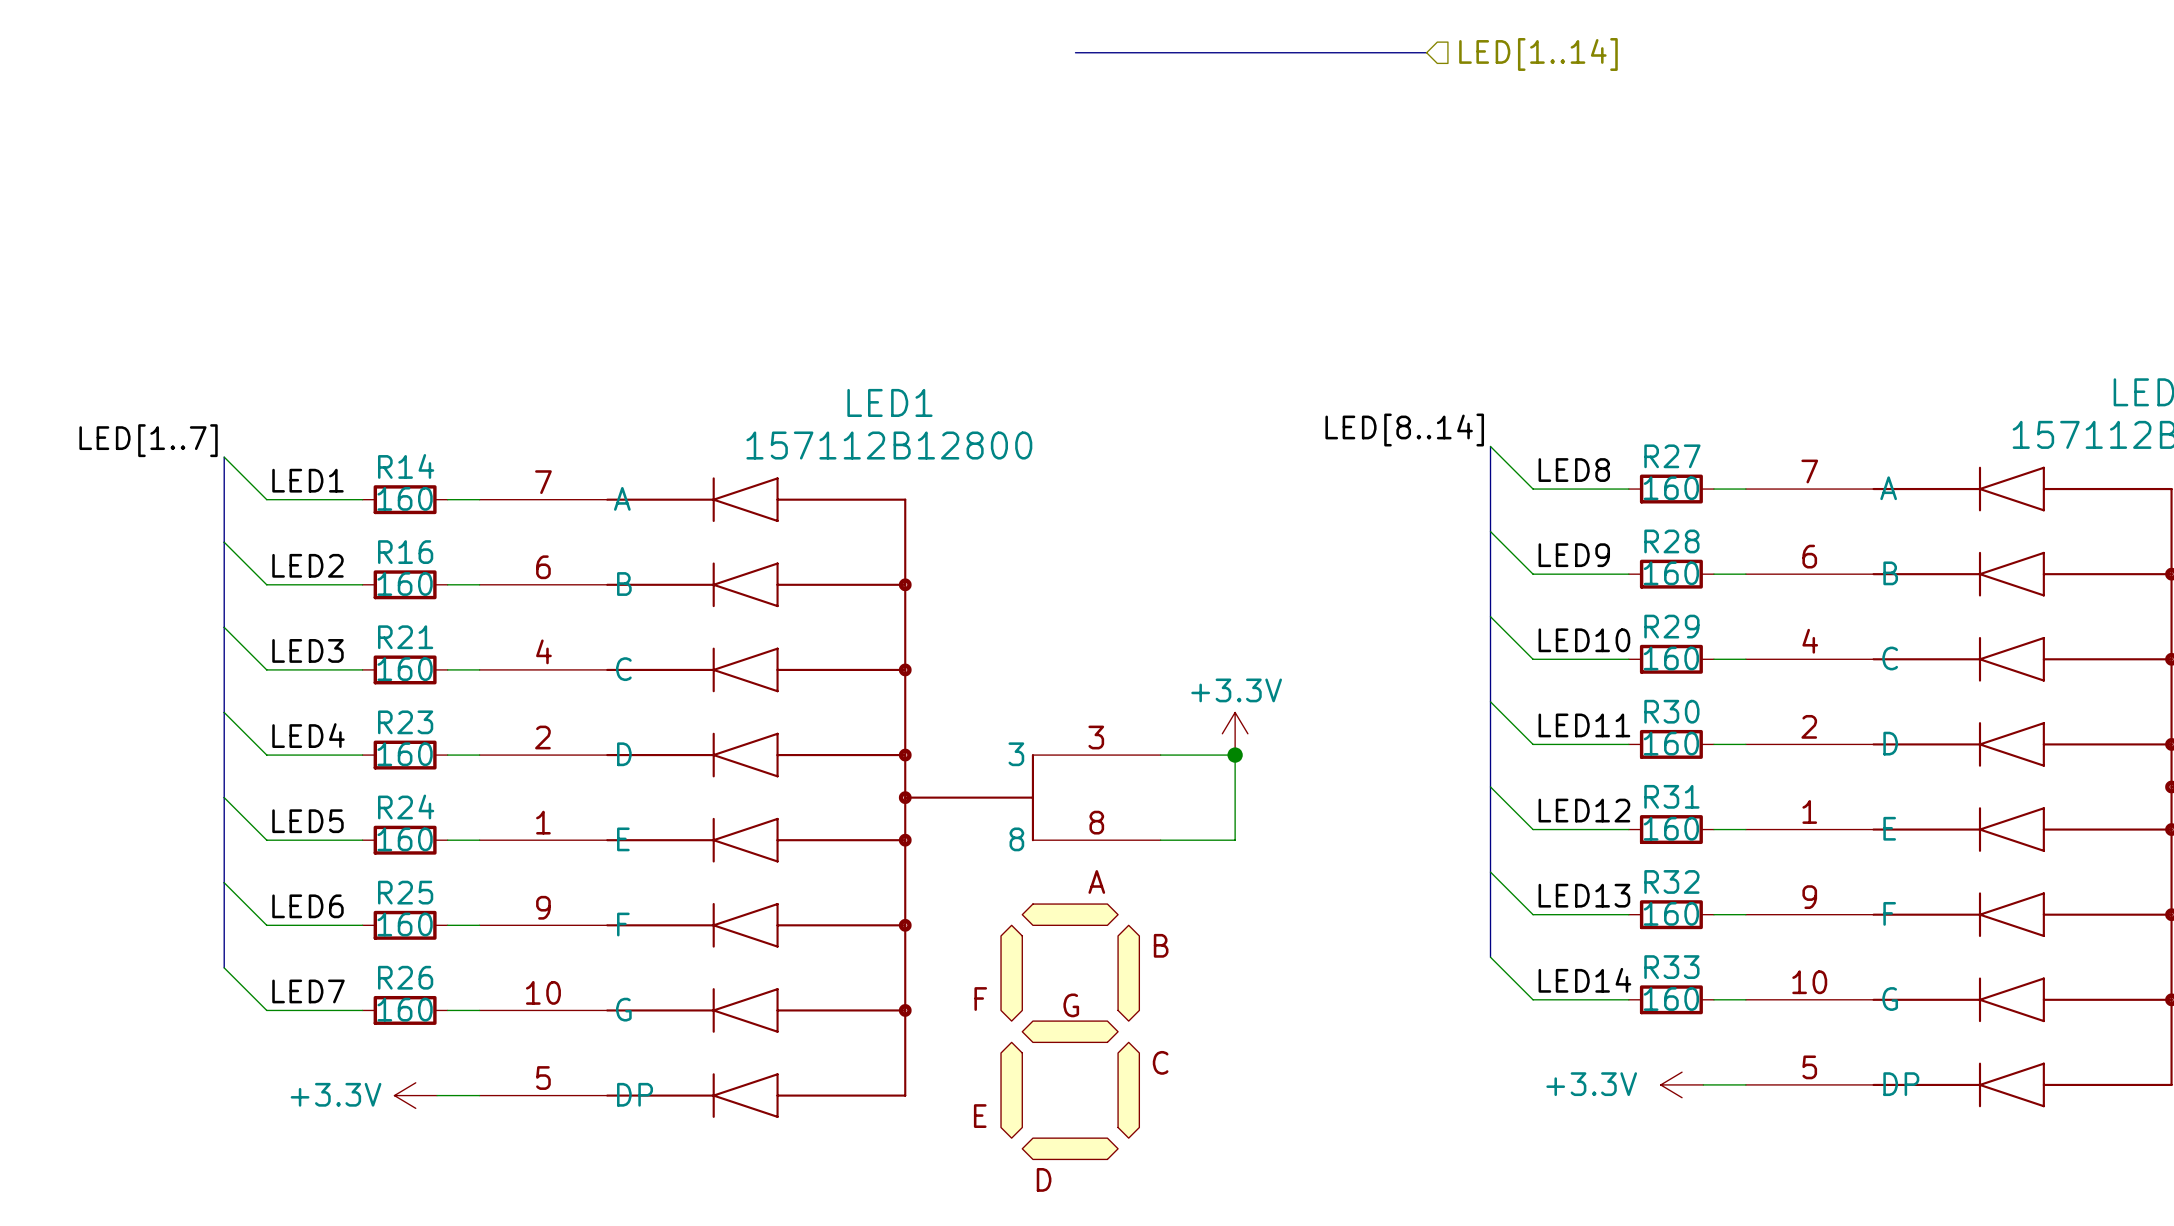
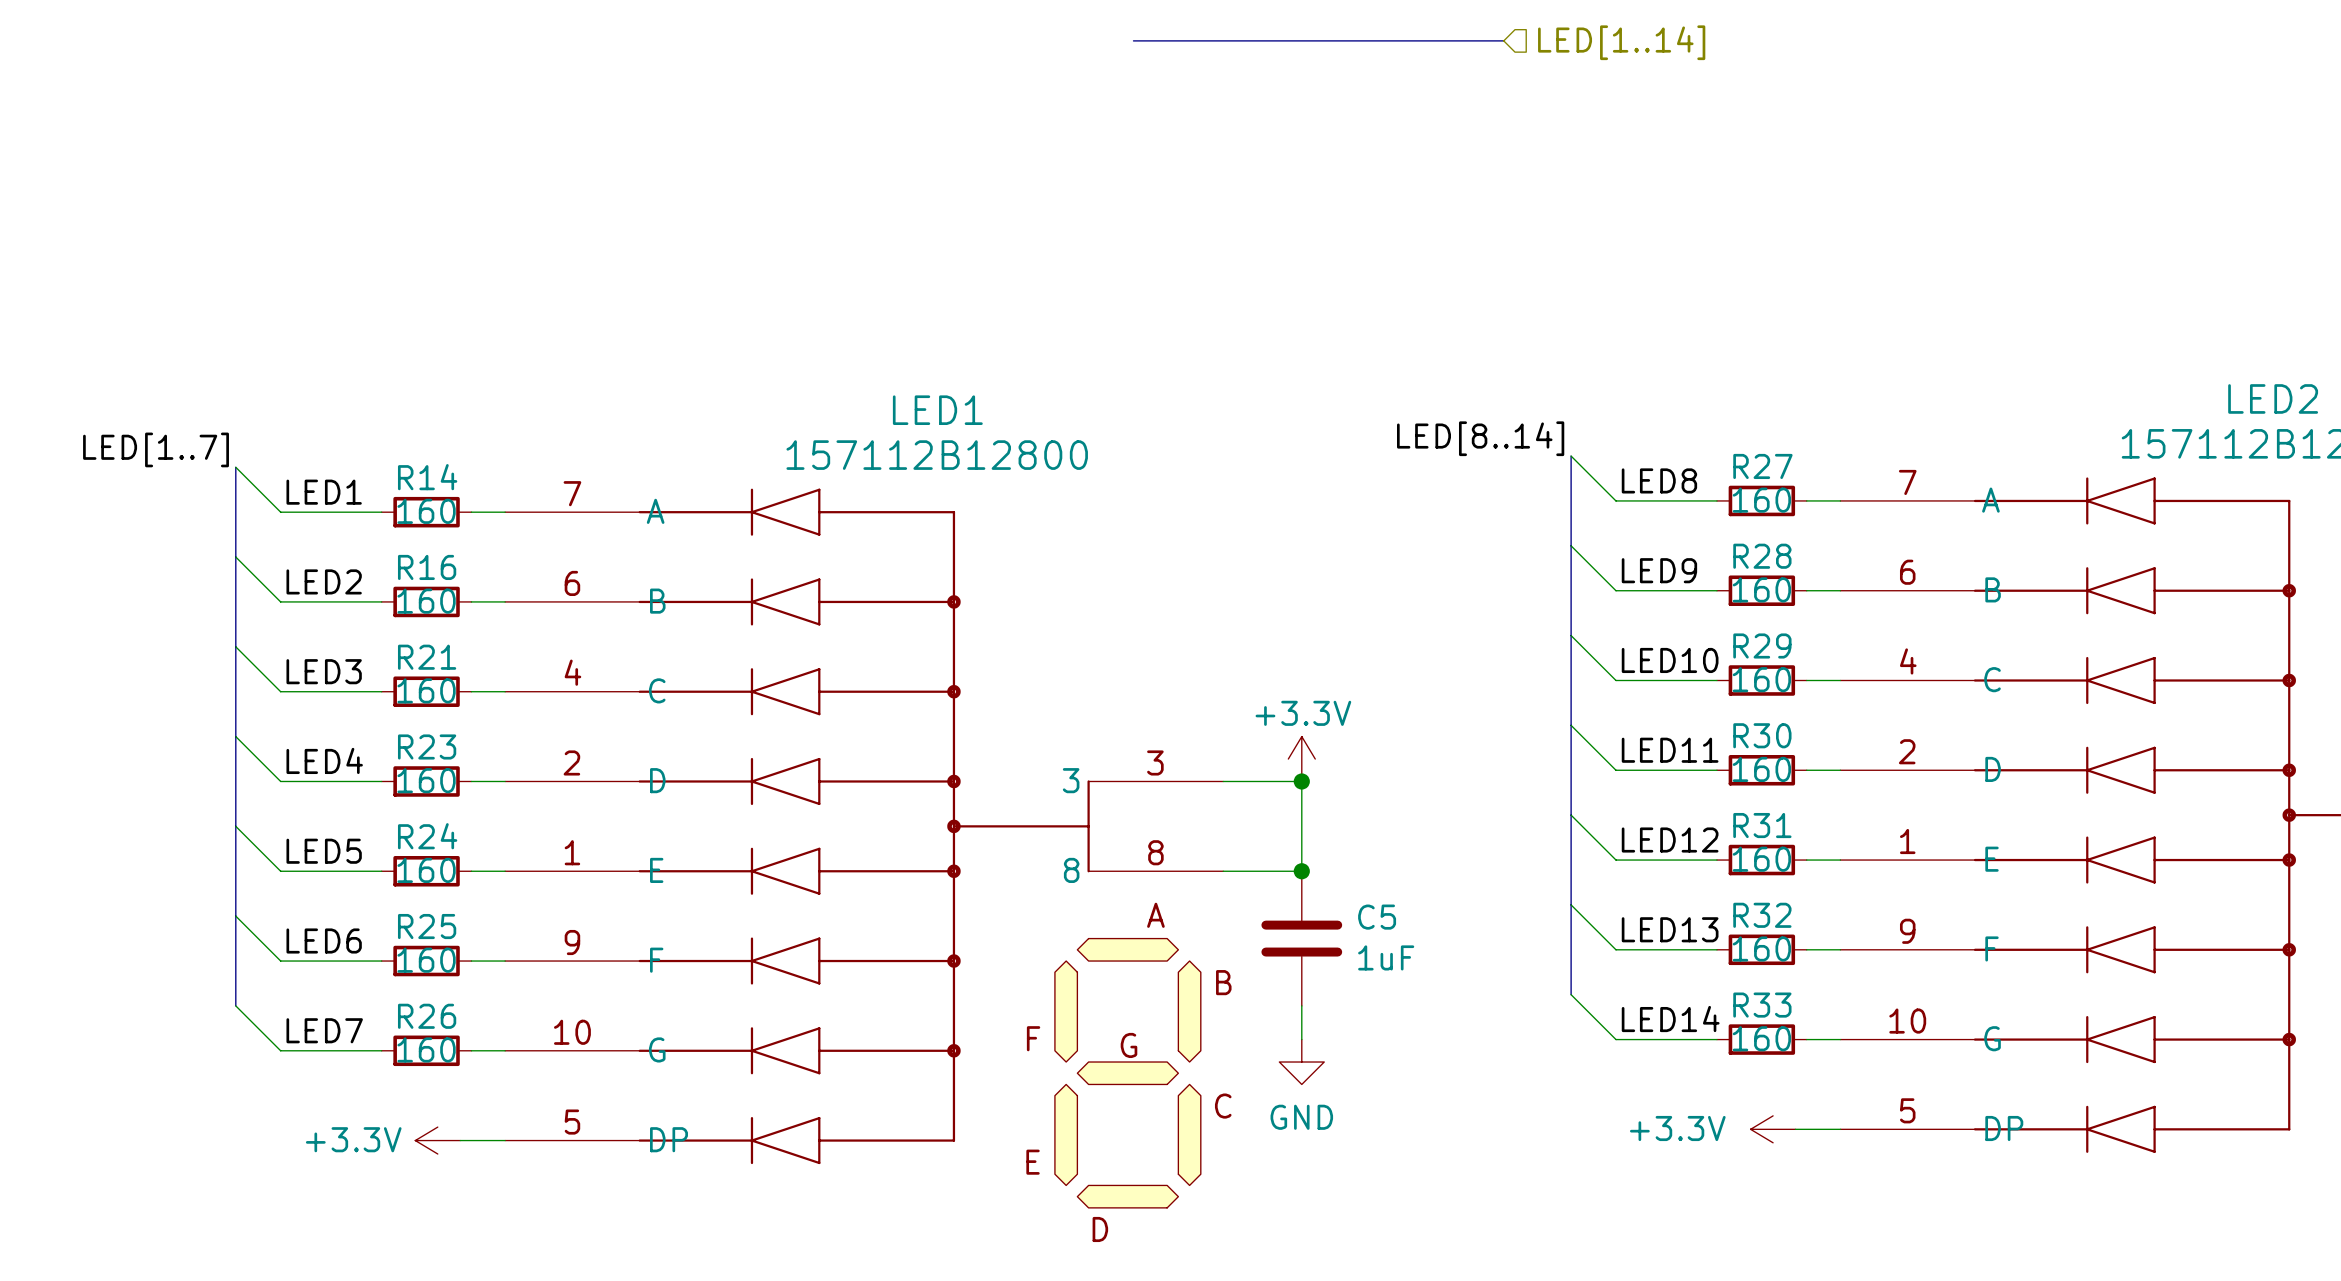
junction: none -> (1301, 871)
C5: none -> 1uF (1301, 938)
wire: none -> (1301, 1005) (1301, 1039)
power symbol: none -> GND (1301, 1062)

